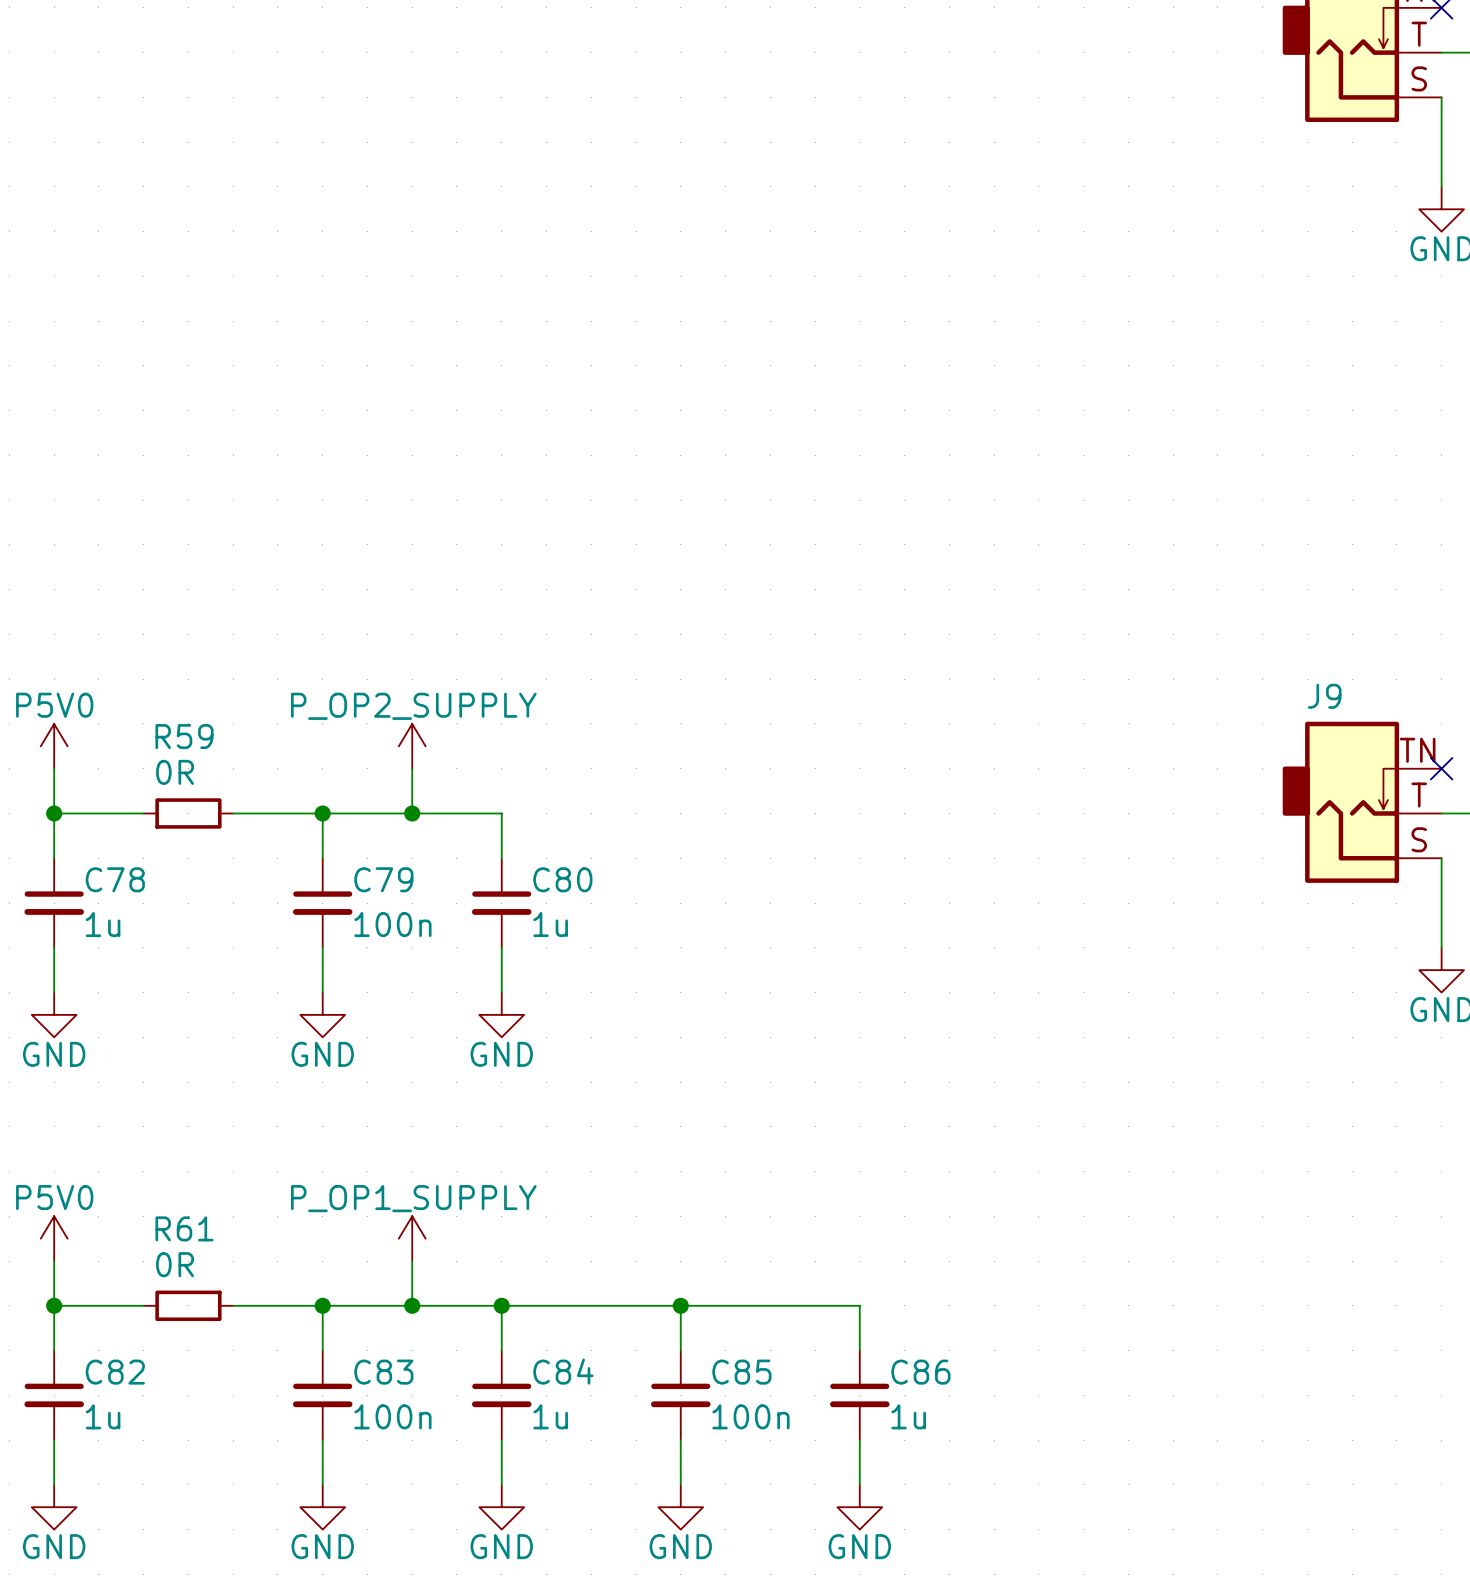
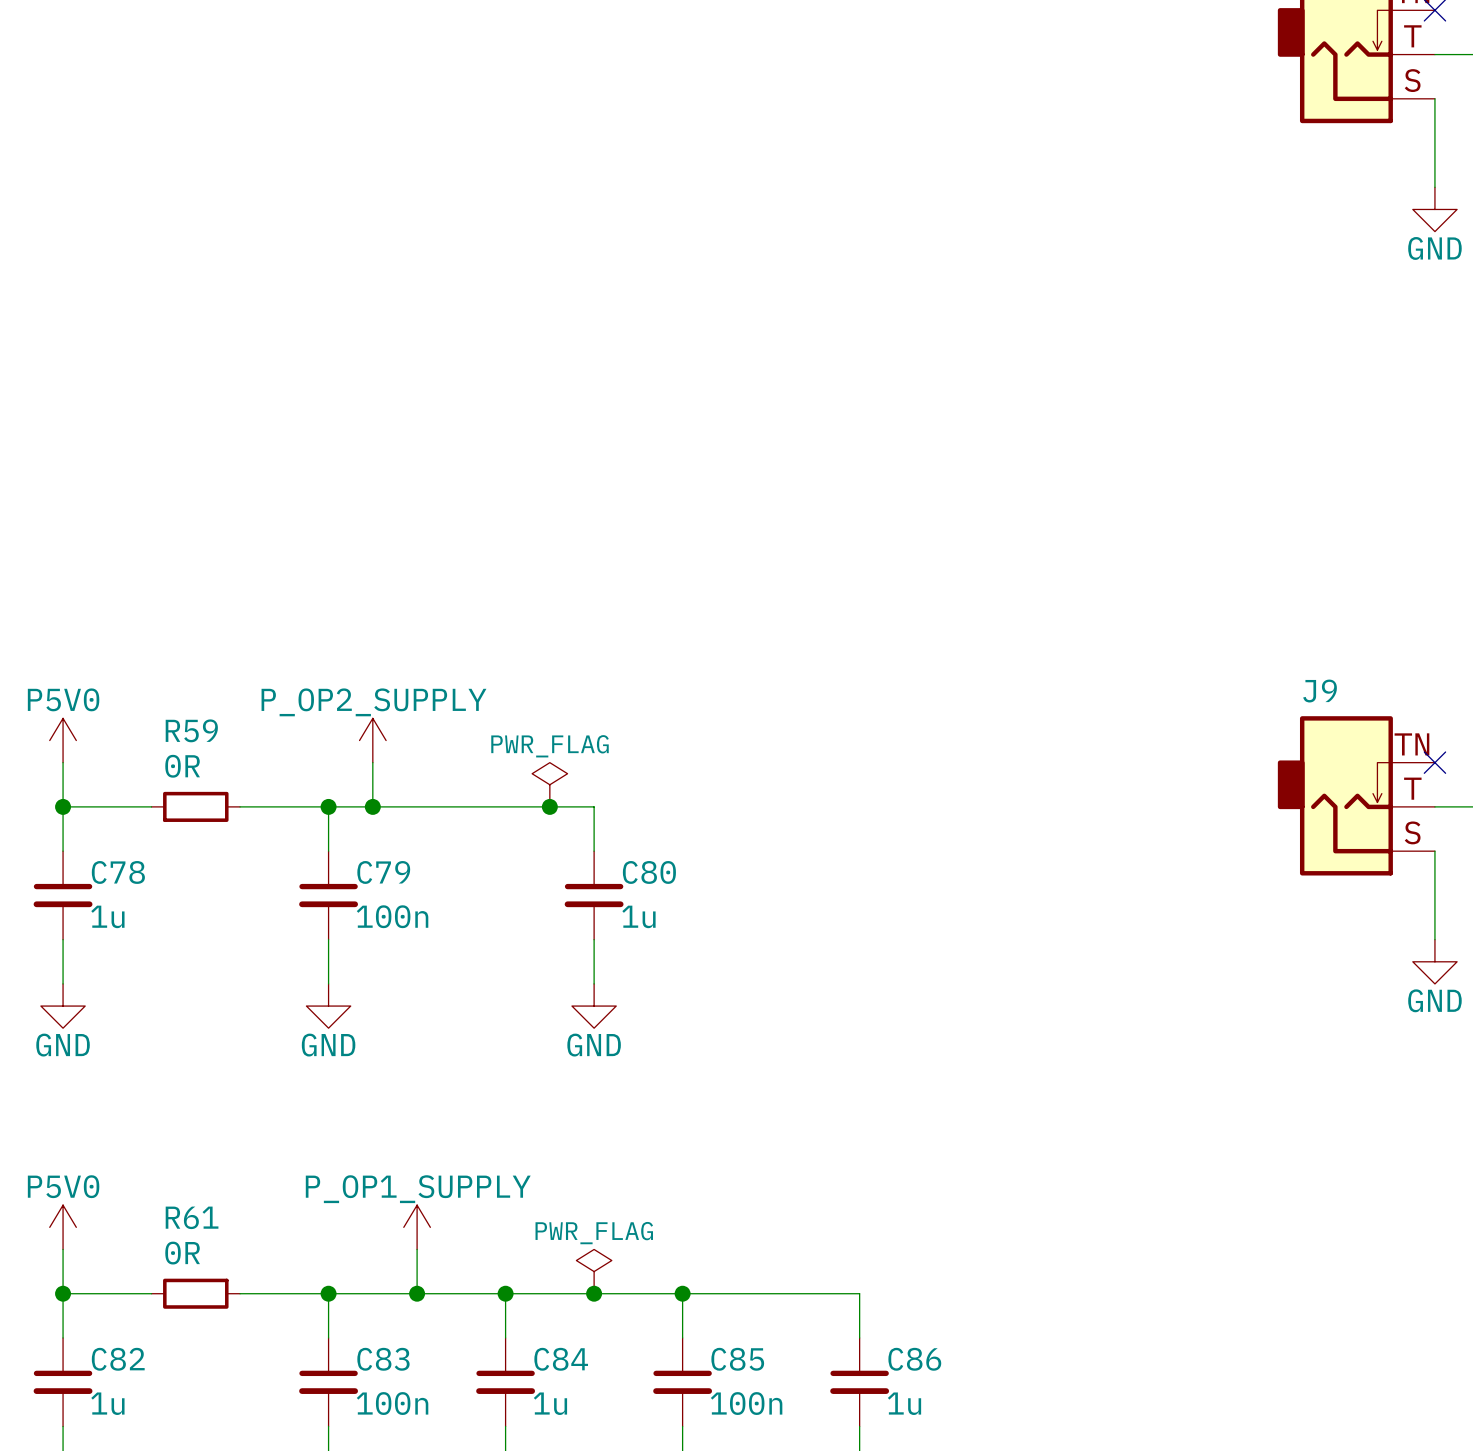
power symbol position: P_OP2_SUPPLY (412, 746) -> P_OP2_SUPPLY (372, 740)
wire: (412, 768) (412, 813) -> (372, 762) (372, 806)
power symbol: none -> PWR_FLAG (549, 784)
junction position: (412, 813) -> (372, 806)
wire: (501, 813) (501, 858) -> (505, 806) (594, 806) (594, 851)
junction: none -> (549, 806)
C80 position: (501, 903) -> (594, 895)
wire: (501, 947) (501, 992) -> (594, 939) (594, 983)
power symbol position: GND (501, 1014) -> GND (594, 1006)
power symbol: none -> PWR_FLAG (594, 1271)
junction: none -> (594, 1293)

